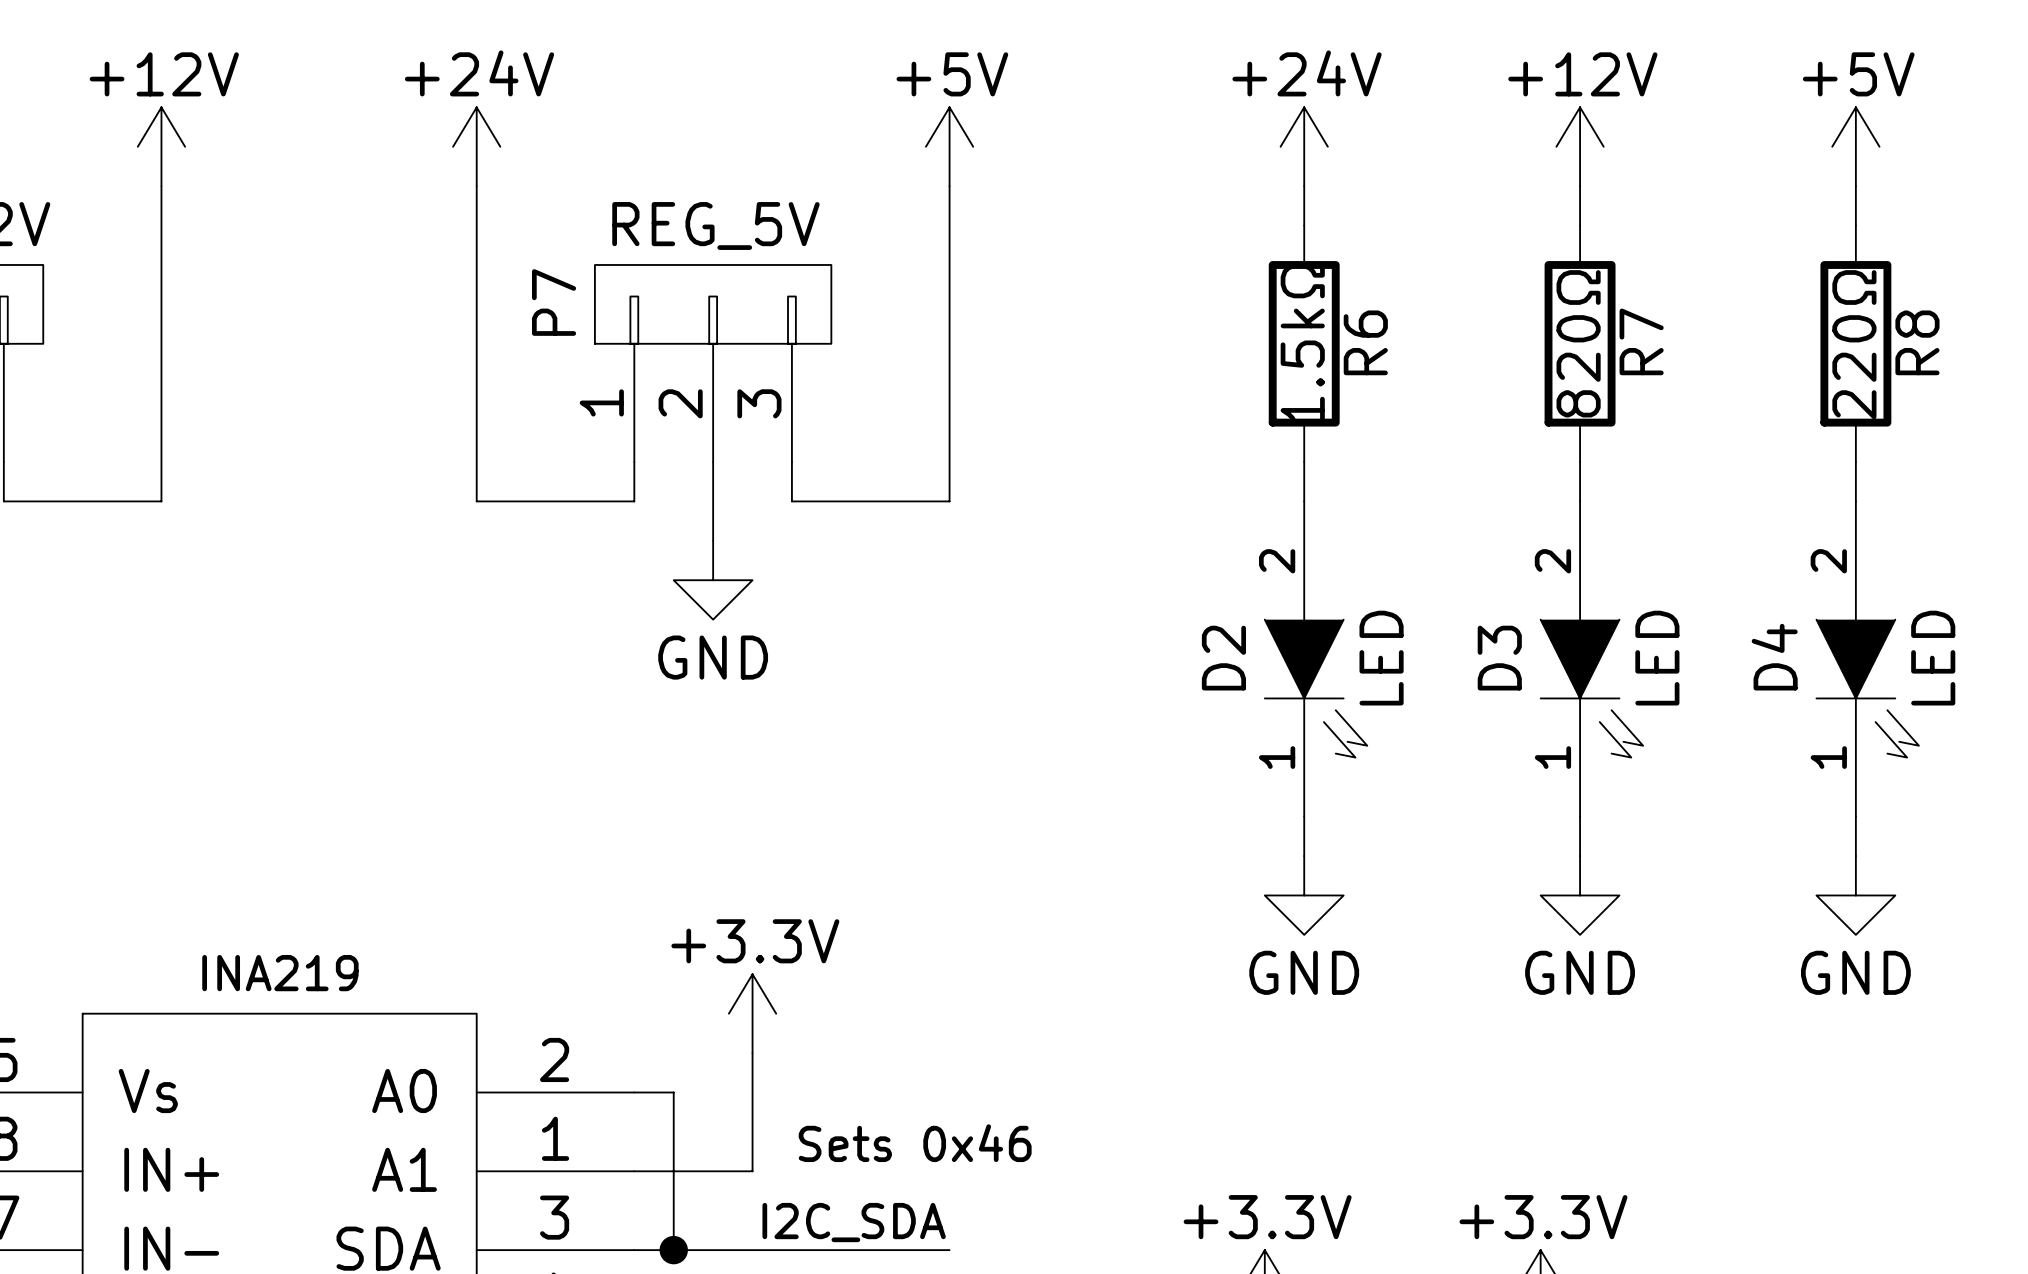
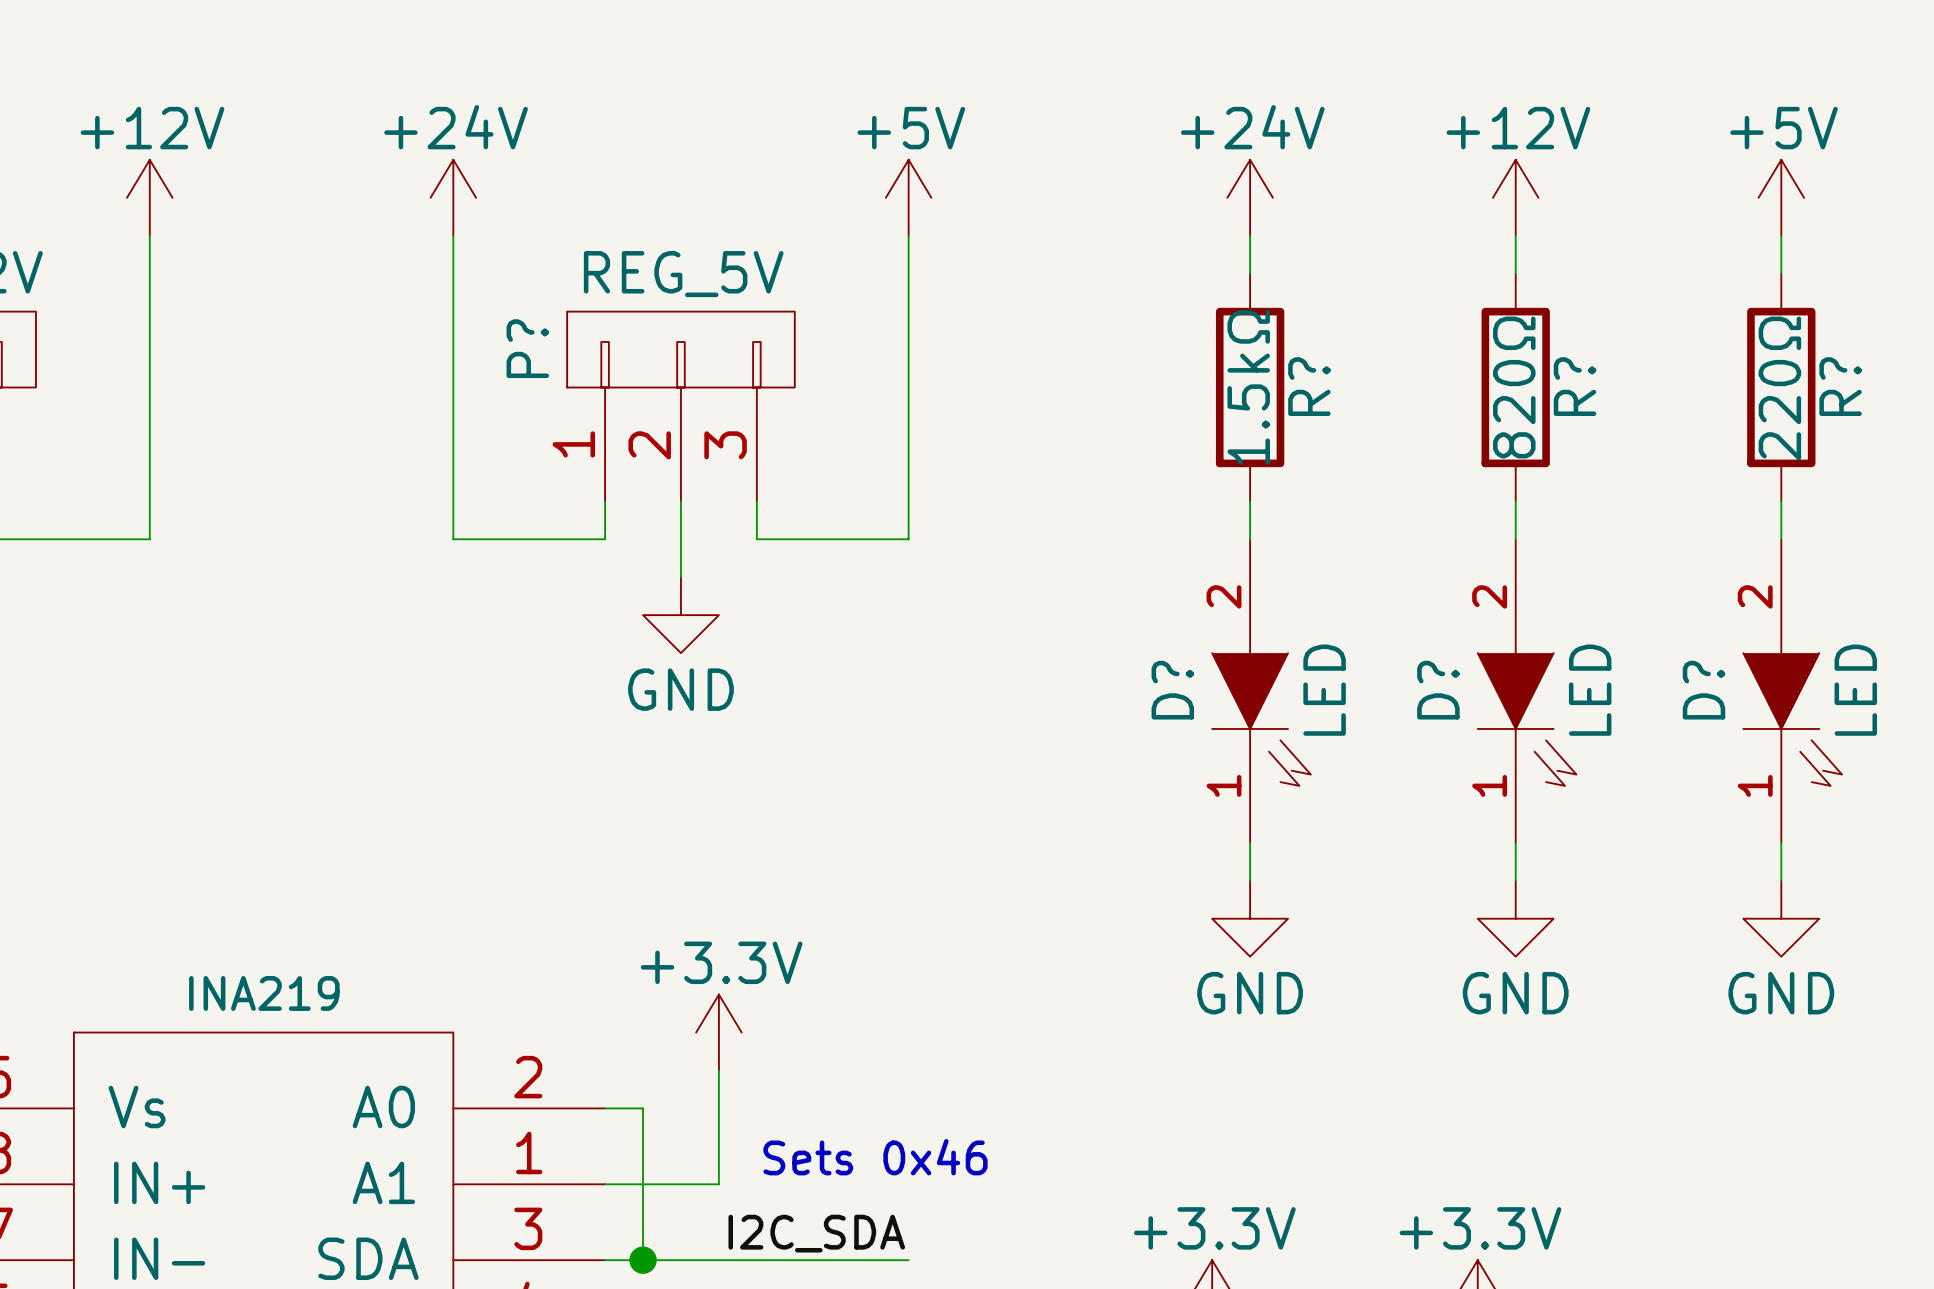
P7 name: P7 (554, 302) -> P? (527, 348)
R7 name: R7 (1641, 341) -> R? (1575, 386)
R6 name: R6 (1365, 342) -> R? (1309, 386)
R8 name: R8 (1917, 342) -> R? (1840, 386)
D4 name: D4 (1774, 657) -> D? (1704, 690)
D2 name: D2 (1223, 658) -> D? (1172, 690)
D3 name: D3 (1499, 658) -> D? (1438, 690)

